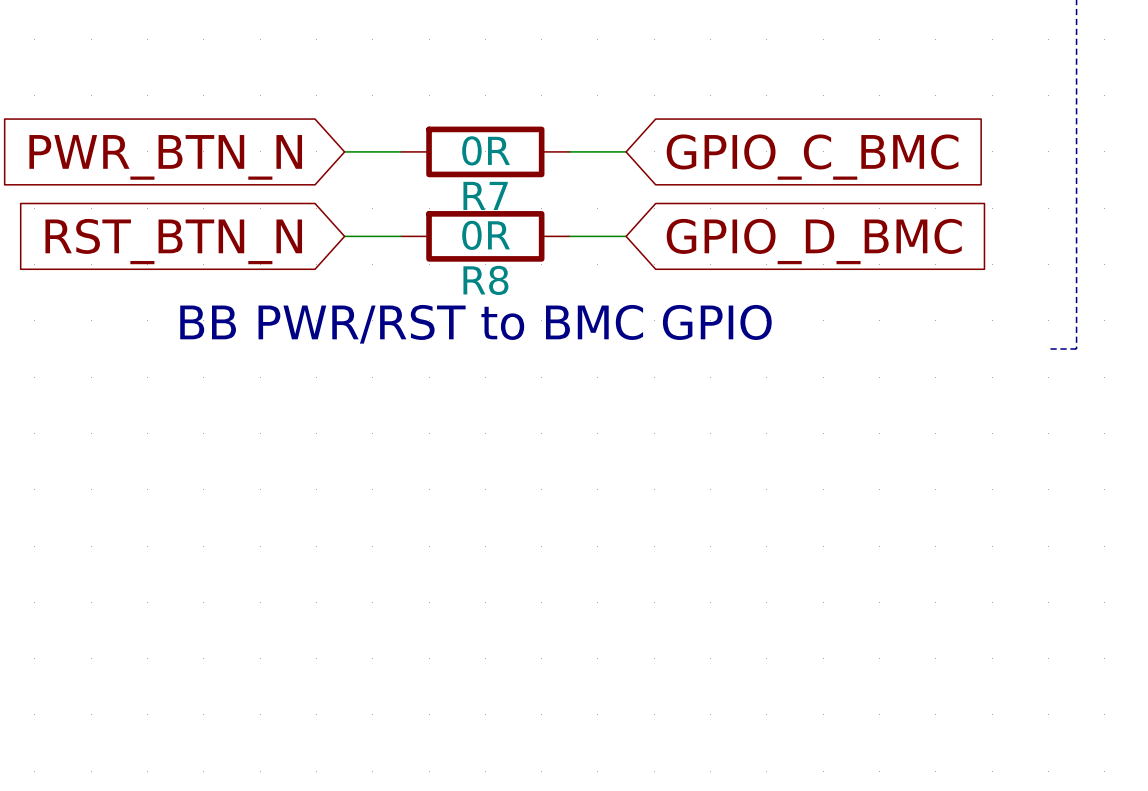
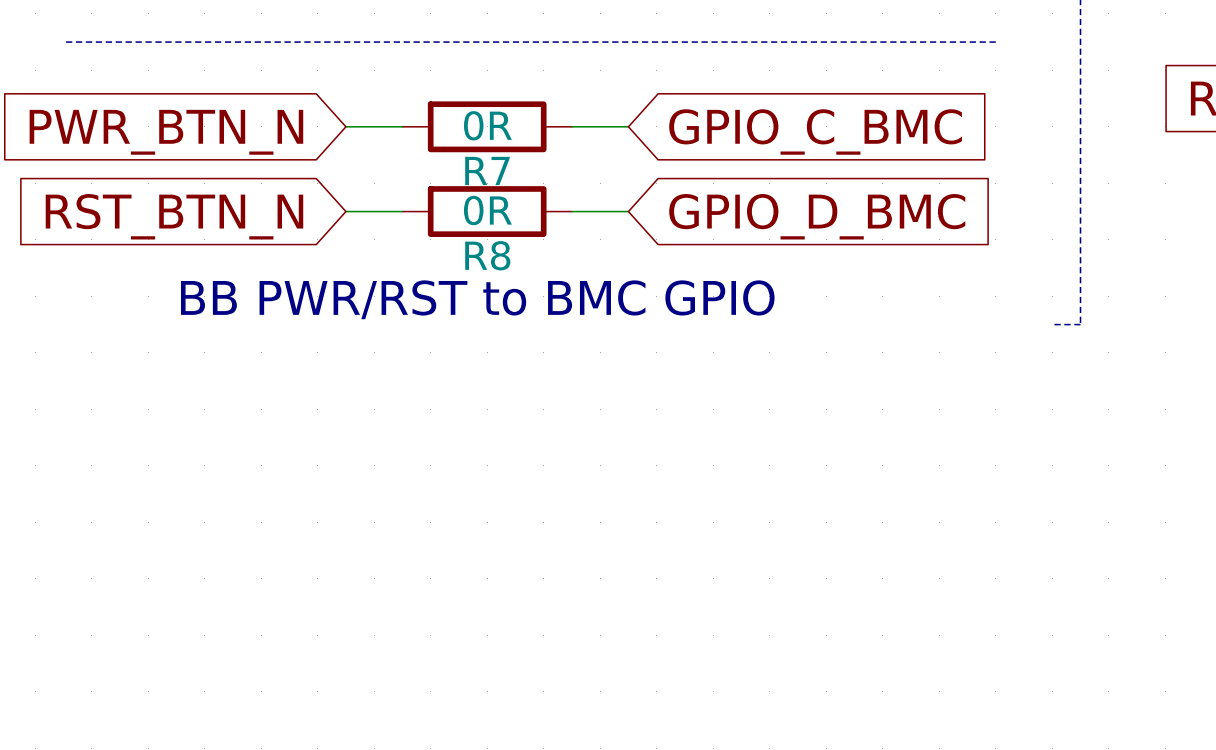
line: none -> (63, 42) (995, 42)

